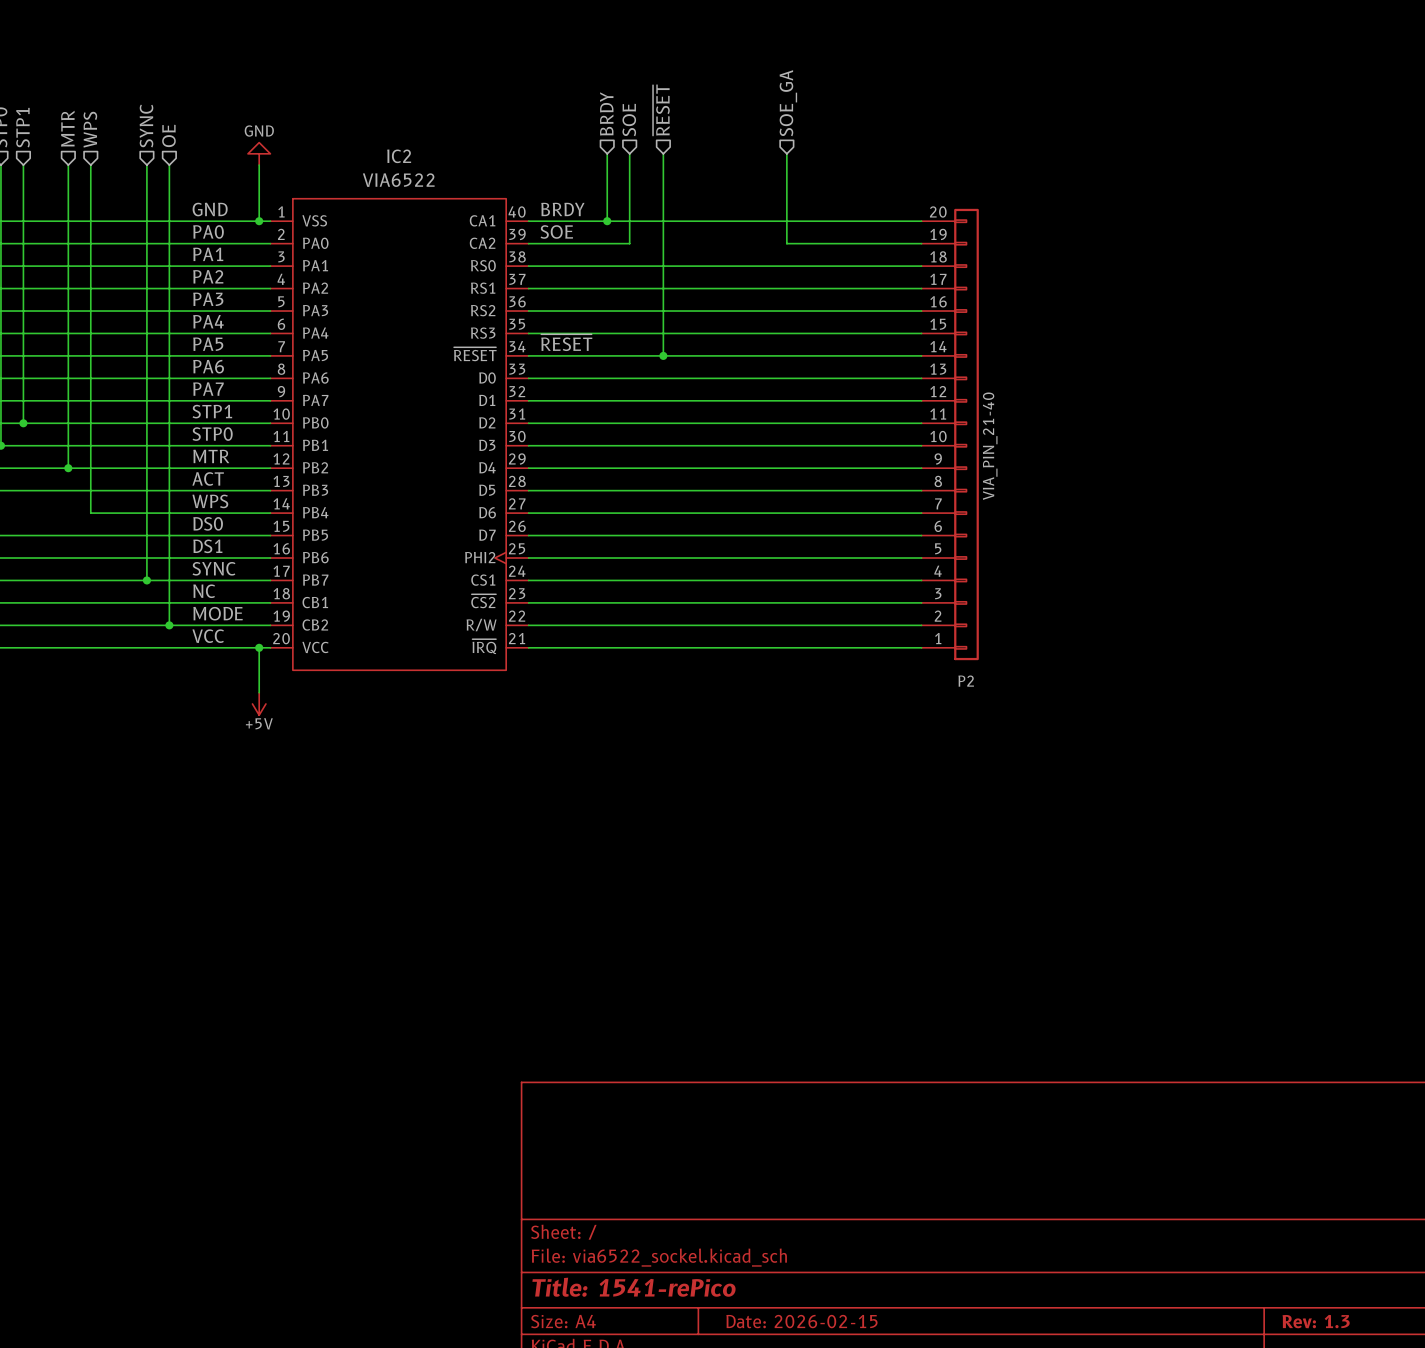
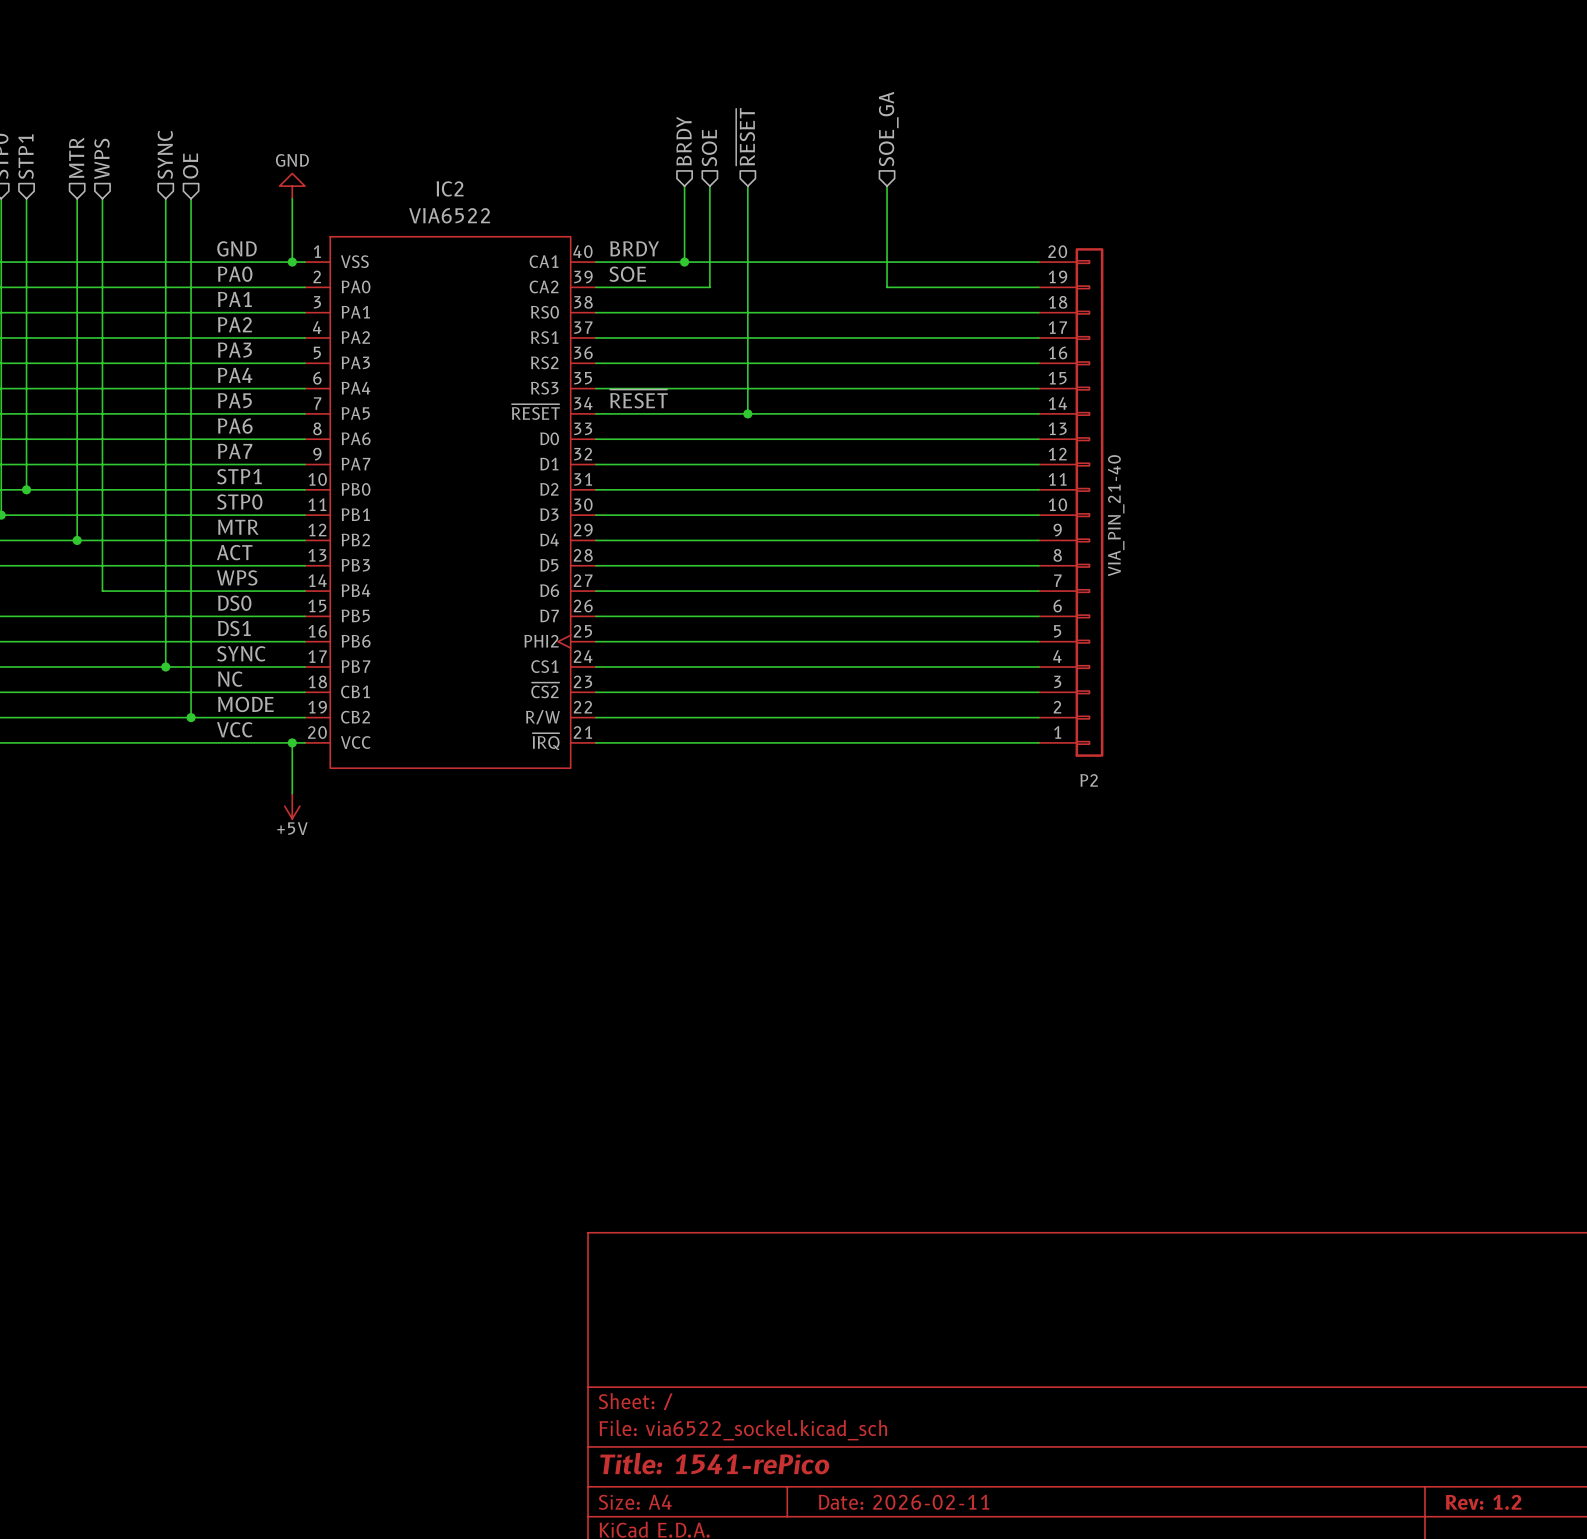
title block: Date: 2026-02-15 (801, 1321) -> Date: 2026-02-11 (904, 1502)
title block: Rev: 1.3 (1316, 1321) -> Rev: 1.2 (1483, 1502)

